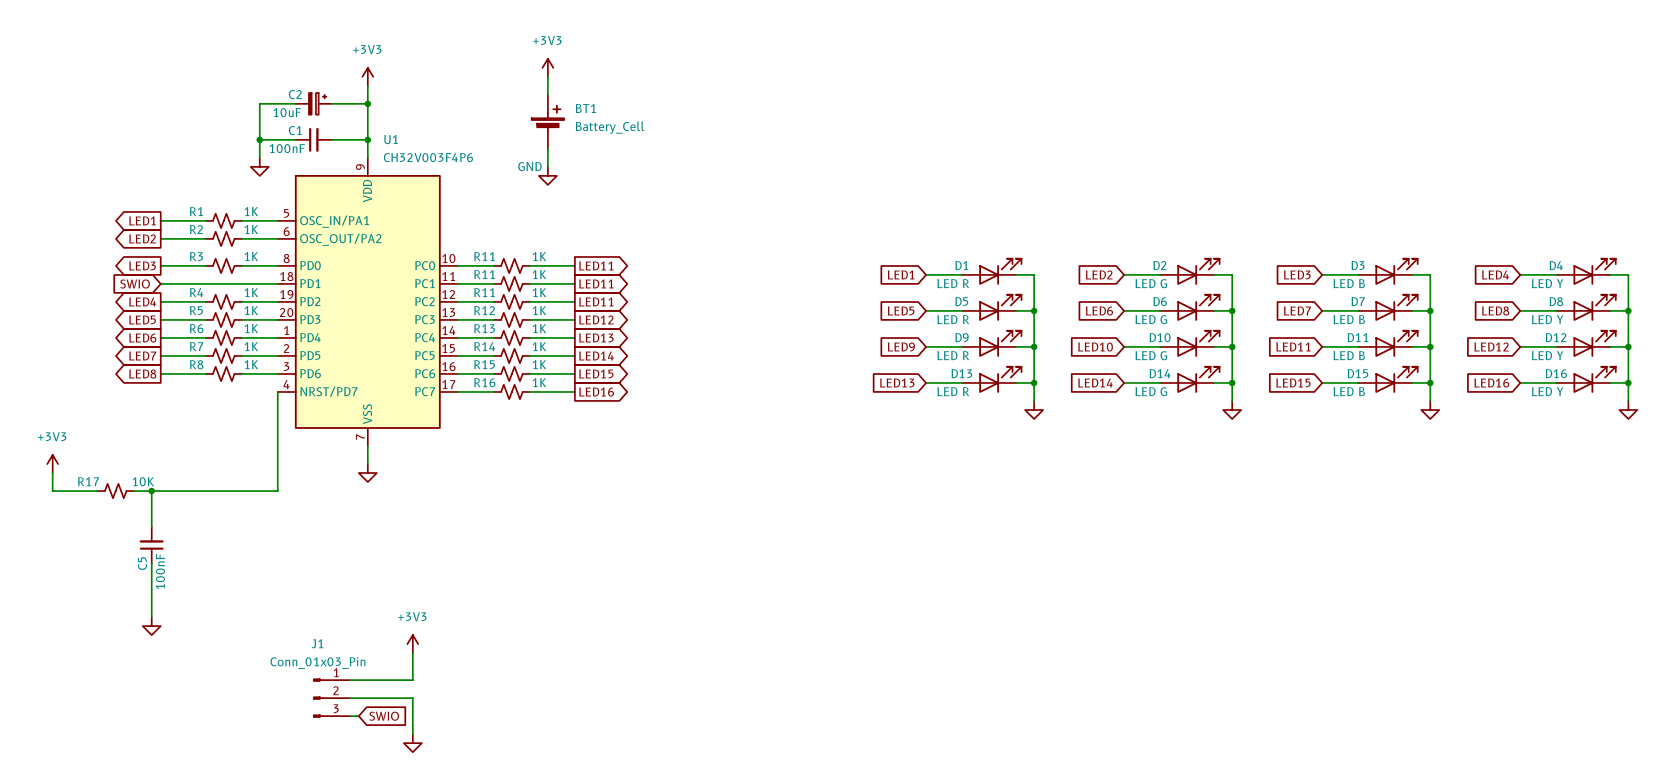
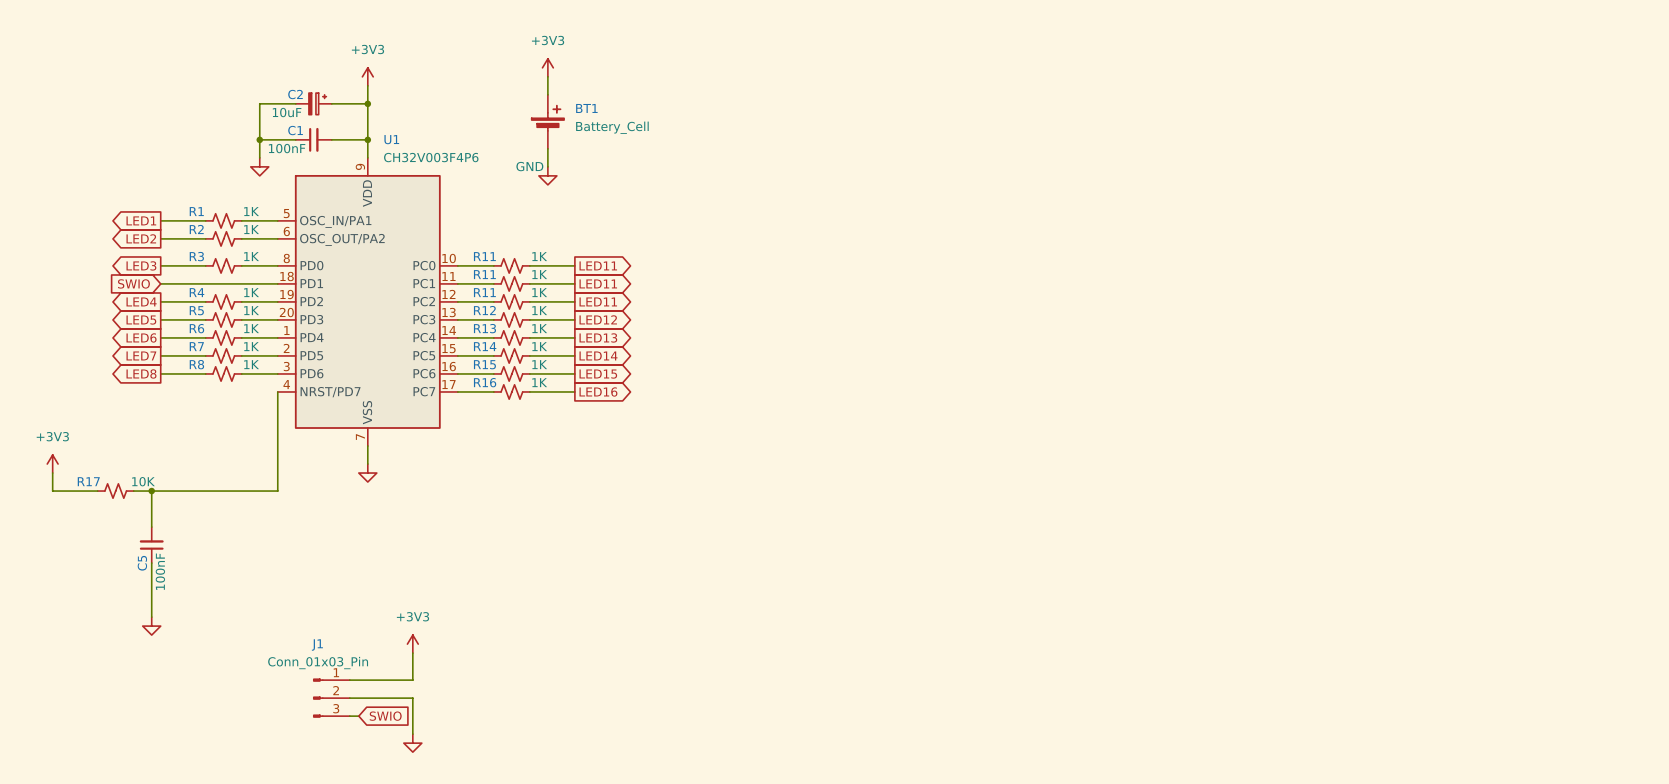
D1: LED R (991, 271) -> none
D2: LED G (1189, 271) -> none
D3: LED B (1387, 271) -> none
D4: LED Y (1586, 271) -> none
global label: LED1 (901, 274) -> none
wire: (926, 274) (962, 274) -> none
wire: (1016, 274) (1034, 274) (1034, 400) -> none
global label: LED2 (1099, 274) -> none
wire: (1124, 274) (1160, 274) -> none
wire: (1214, 274) (1232, 274) (1232, 400) -> none
global label: LED3 (1297, 274) -> none
wire: (1322, 274) (1358, 274) -> none
wire: (1412, 274) (1430, 274) (1430, 400) -> none
global label: LED4 (1495, 274) -> none
wire: (1520, 274) (1556, 274) -> none
wire: (1610, 274) (1628, 274) (1628, 400) -> none
D5: LED R (991, 307) -> none
D6: LED G (1189, 307) -> none
D7: LED B (1387, 307) -> none
D8: LED Y (1586, 307) -> none
global label: LED5 (901, 310) -> none
wire: (926, 310) (962, 310) -> none
wire: (1016, 310) (1034, 310) -> none
junction: (1034, 310) -> none
wire: (1124, 310) (1160, 310) -> none
wire: (1214, 310) (1232, 310) -> none
junction: (1232, 310) -> none
global label: LED7 (1297, 310) -> none
wire: (1322, 310) (1358, 310) -> none
wire: (1412, 310) (1430, 310) -> none
junction: (1430, 310) -> none
wire: (1520, 310) (1556, 310) -> none
wire: (1610, 310) (1628, 310) -> none
junction: (1628, 310) -> none
global label: LED6 (1099, 311) -> none
global label: LED8 (1495, 311) -> none
D9: LED R (991, 343) -> none
D10: LED G (1189, 343) -> none
D11: LED B (1387, 343) -> none
D12: LED Y (1586, 343) -> none
wire: (926, 346) (962, 346) -> none
wire: (1016, 346) (1034, 346) -> none
junction: (1034, 346) -> none
wire: (1124, 346) (1160, 346) -> none
wire: (1214, 346) (1232, 346) -> none
junction: (1232, 346) -> none
global label: LED11 (1293, 346) -> none
wire: (1322, 346) (1358, 346) -> none
wire: (1412, 346) (1430, 346) -> none
junction: (1430, 346) -> none
global label: LED12 (1491, 346) -> none
wire: (1520, 346) (1556, 346) -> none
wire: (1610, 346) (1628, 346) -> none
junction: (1628, 346) -> none
global label: LED9 (901, 347) -> none
global label: LED10 (1095, 347) -> none
D13: LED R (991, 379) -> none
D14: LED G (1189, 379) -> none
D15: LED B (1387, 379) -> none
D16: LED Y (1586, 379) -> none
global label: LED13 (897, 382) -> none
wire: (926, 382) (962, 382) -> none
wire: (1016, 382) (1034, 382) -> none
junction: (1034, 382) -> none
global label: LED14 (1095, 382) -> none
wire: (1124, 382) (1160, 382) -> none
wire: (1214, 382) (1232, 382) -> none
junction: (1232, 382) -> none
global label: LED15 (1293, 382) -> none
wire: (1322, 382) (1358, 382) -> none
wire: (1412, 382) (1430, 382) -> none
junction: (1430, 382) -> none
wire: (1520, 382) (1556, 382) -> none
wire: (1610, 382) (1628, 382) -> none
junction: (1628, 382) -> none
global label: LED16 (1491, 383) -> none
power symbol: (1034, 409) -> none
power symbol: (1232, 409) -> none
power symbol: (1430, 409) -> none
power symbol: (1628, 409) -> none

